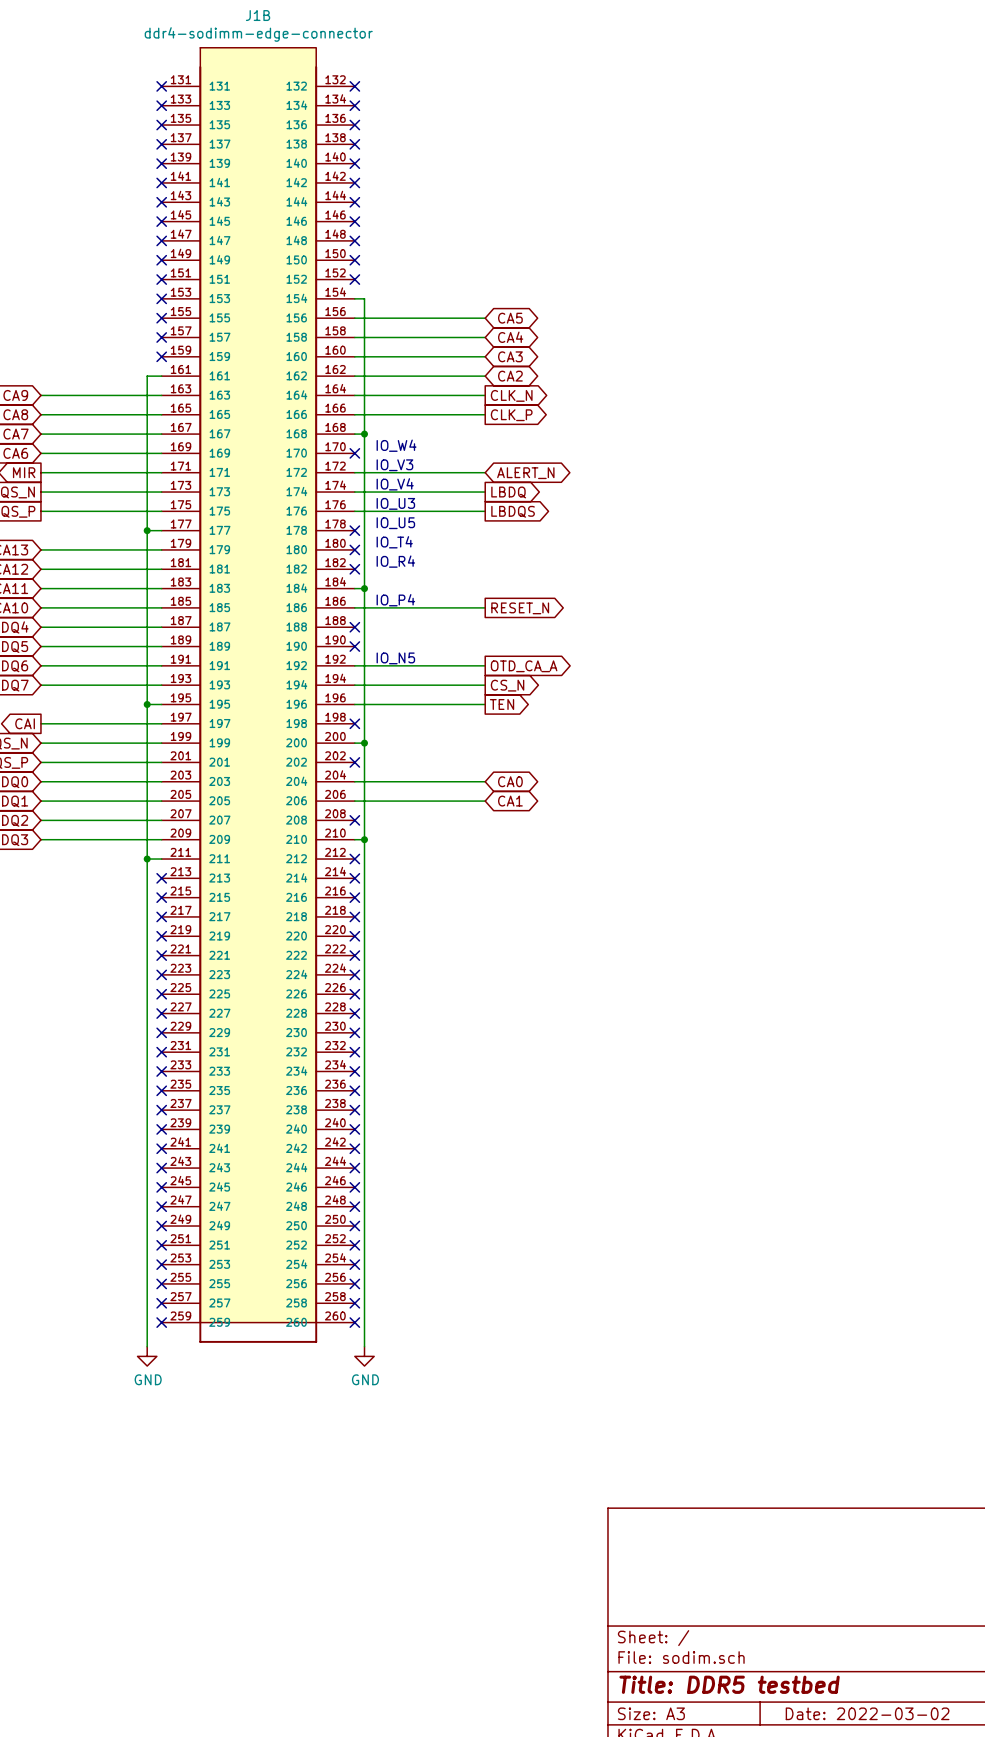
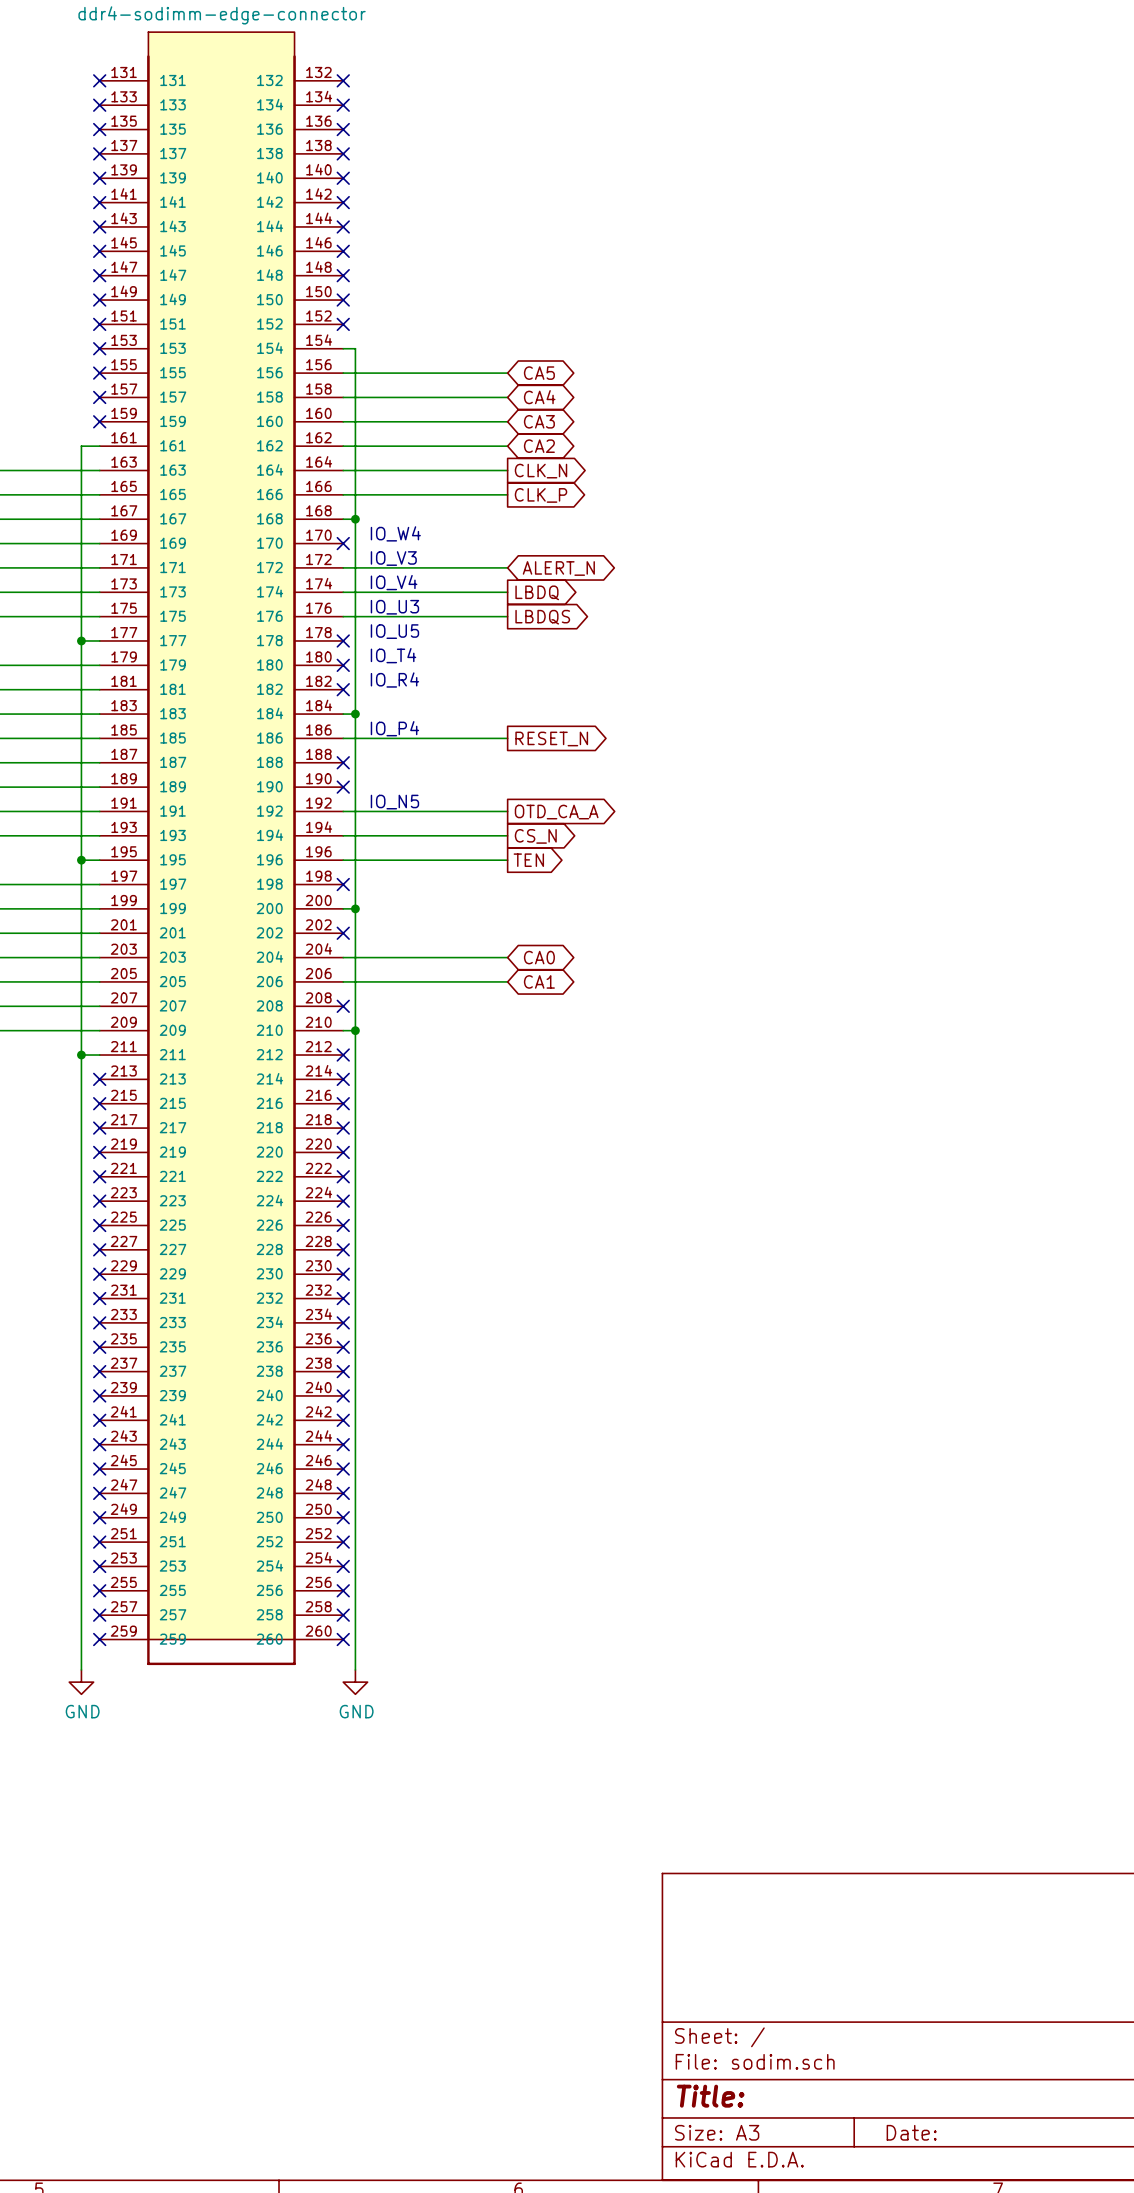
title block: Title: DDR5 testbed (729, 1684) -> Title: (710, 2096)
title block: Date: 2022-03-02 (867, 1713) -> Date: (911, 2132)

